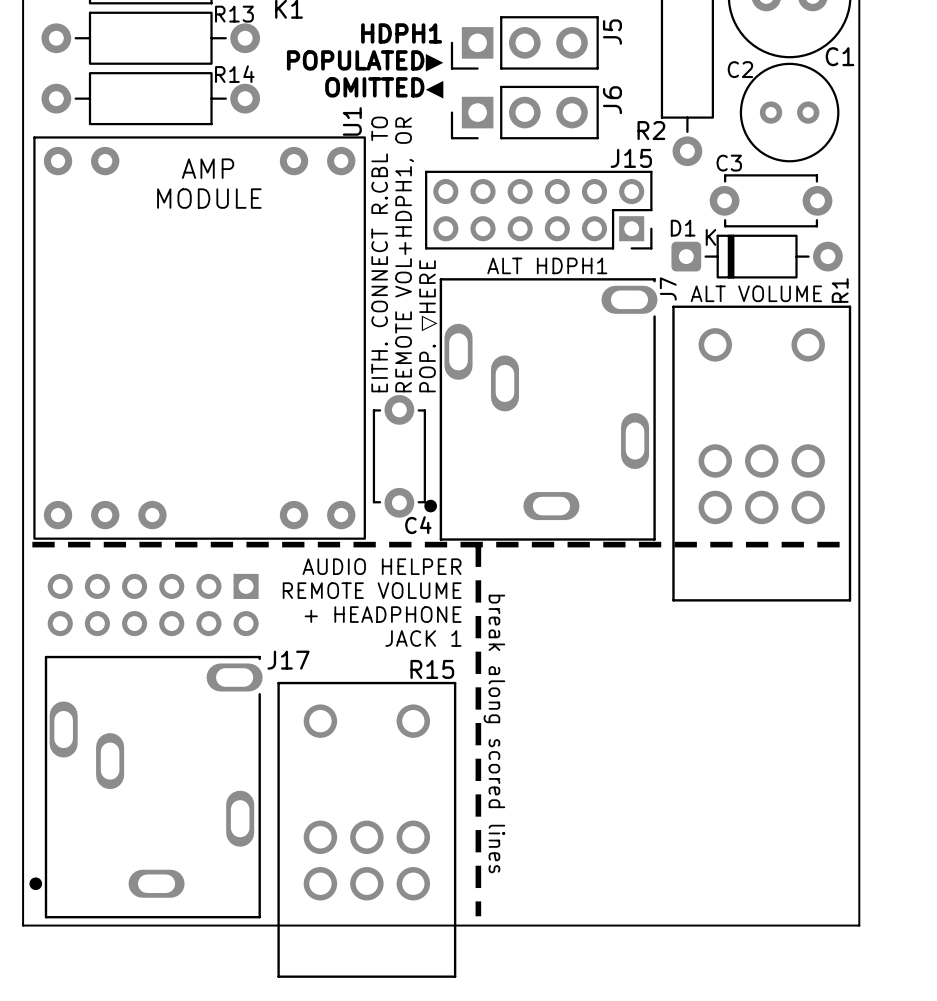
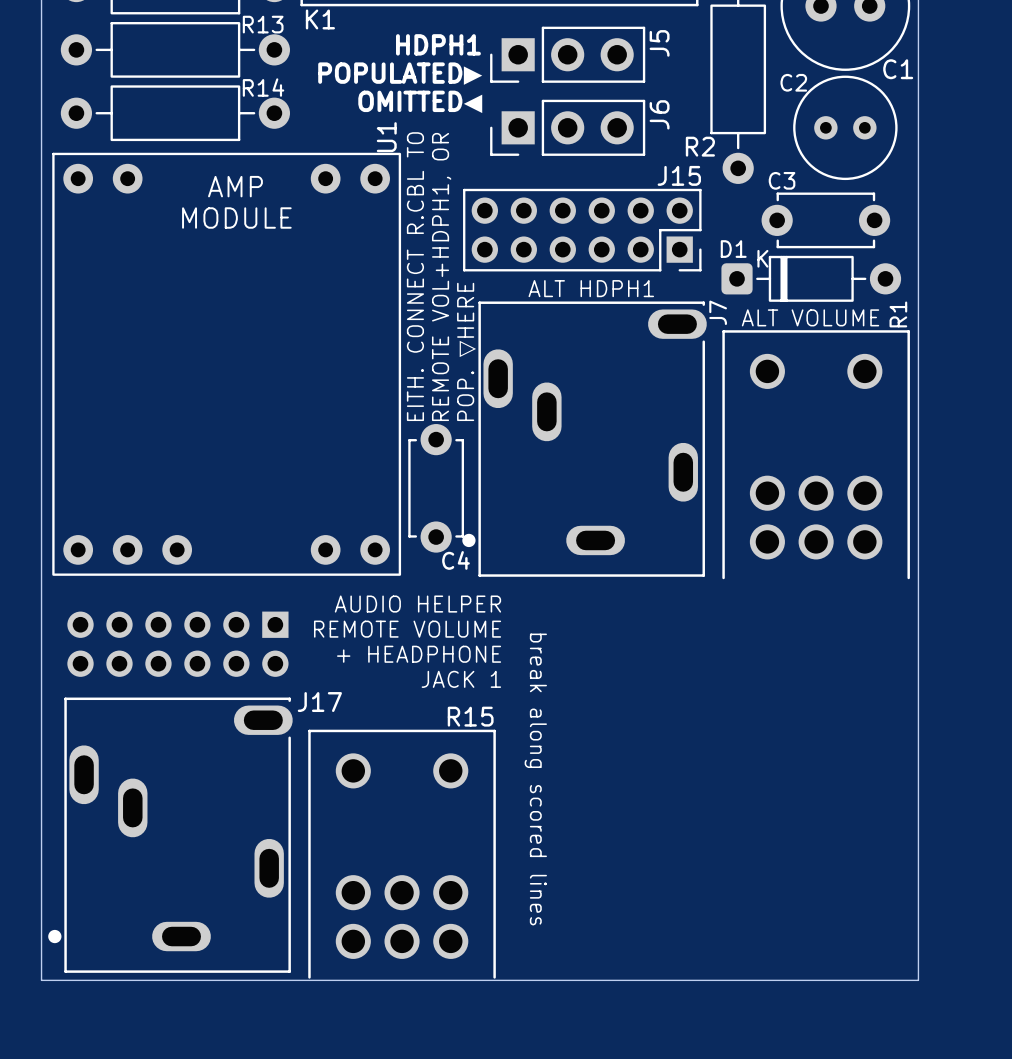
R1 footprint: [672, 305, 852, 602] -> [722, 330, 910, 580]
line: (32, 544) (850, 544) -> none
line: (478, 544) (478, 916) -> none
R15 footprint: [277, 681, 457, 978] -> [308, 729, 496, 979]

